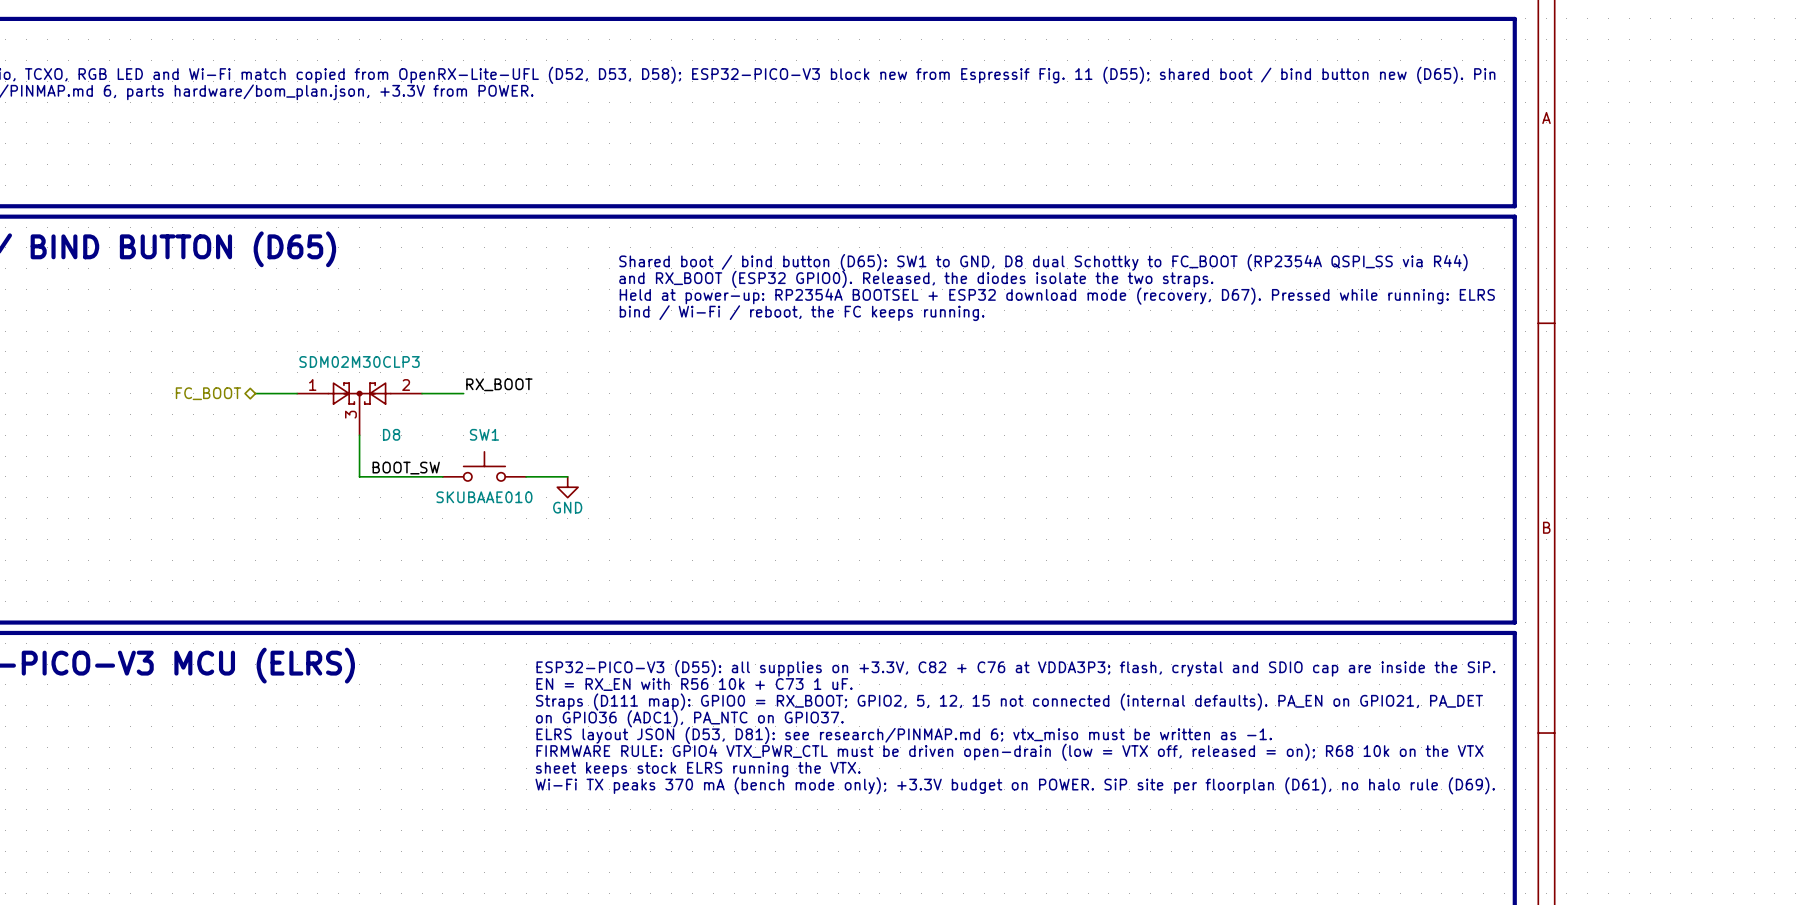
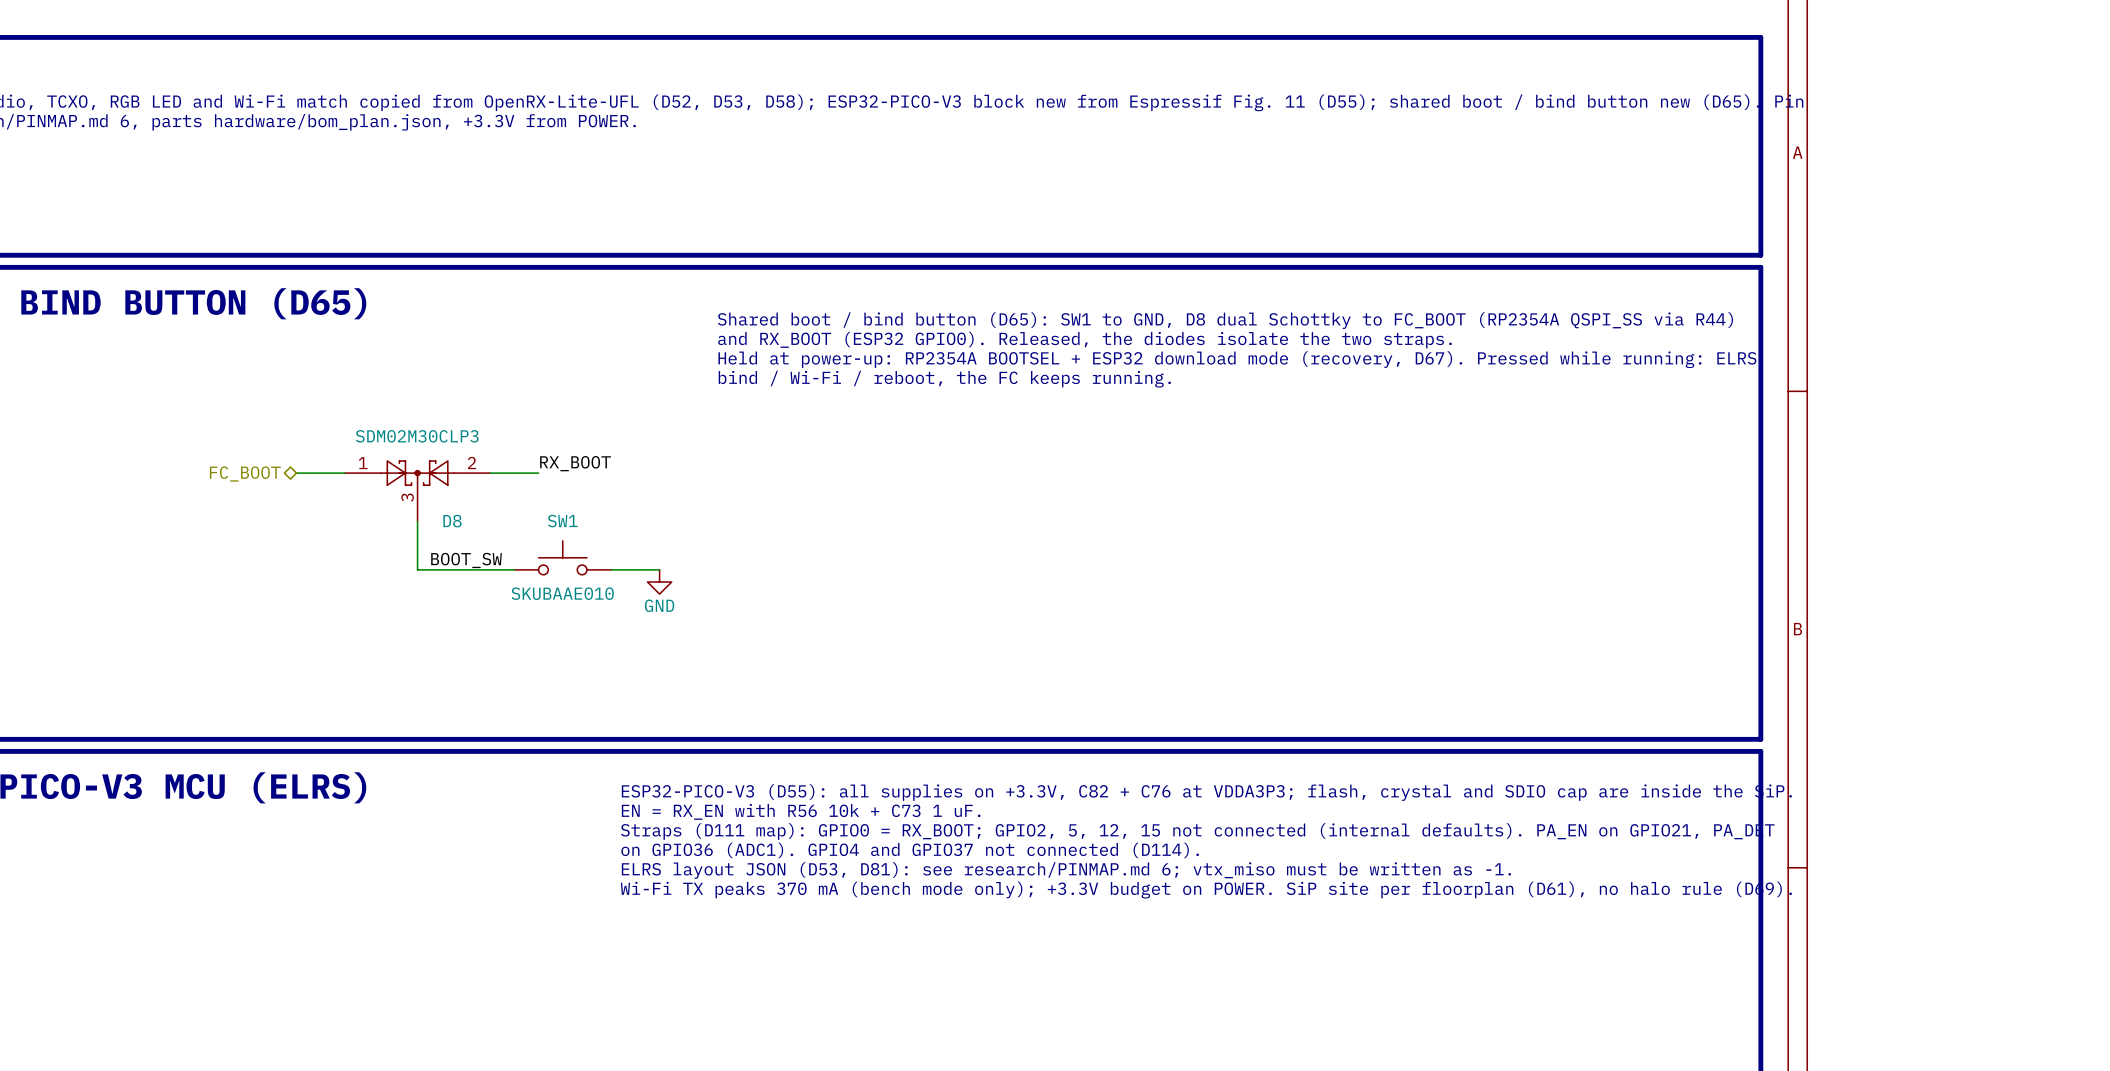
text: on GPIO36 (ADC1), PA_NTC on GPIO37. (689, 718) -> on GPIO36 (ADC1). GPIO4 and GPIO37 not connected (D114). (910, 850)
text: FIRMWARE RULE: GPIO4 VTX_PWR_CTL must be driven open-drain (low = VTX off, released = on); R68 10k on the VTX (1009, 752) -> Wi-Fi TX peaks 370 mA (bench mode only); +3.3V budget on POWER. SiP site per floorplan (D61), no halo rule (D69). (1206, 890)
text: sheet keeps stock ELRS running the VTX. (698, 769) -> none
text: Wi-Fi TX peaks 370 mA (bench mode only); +3.3V budget on POWER. SiP site per floorplan (D61), no halo rule (D69). (1015, 785) -> none

